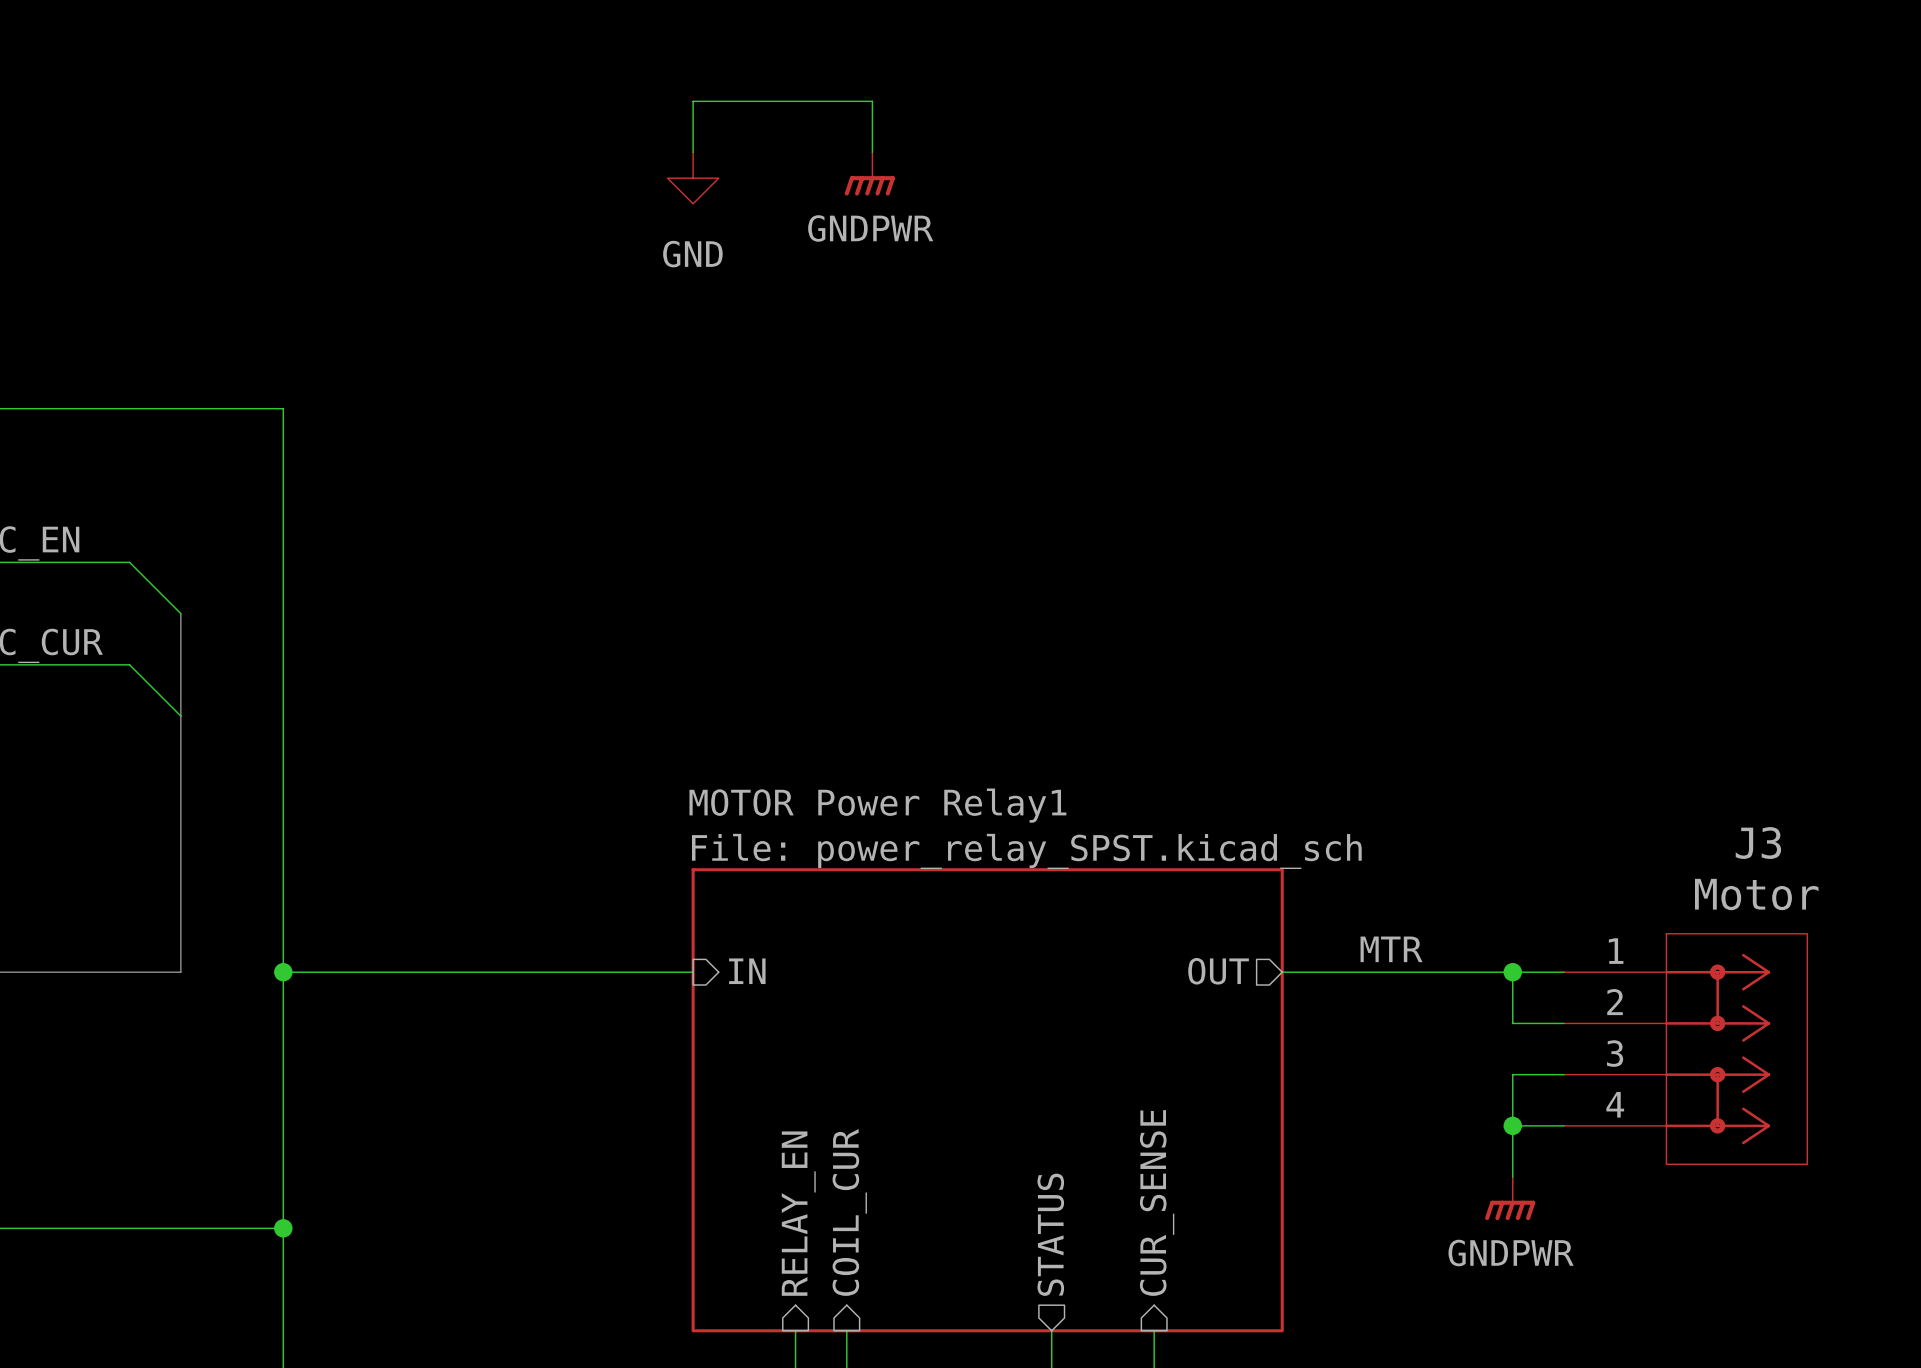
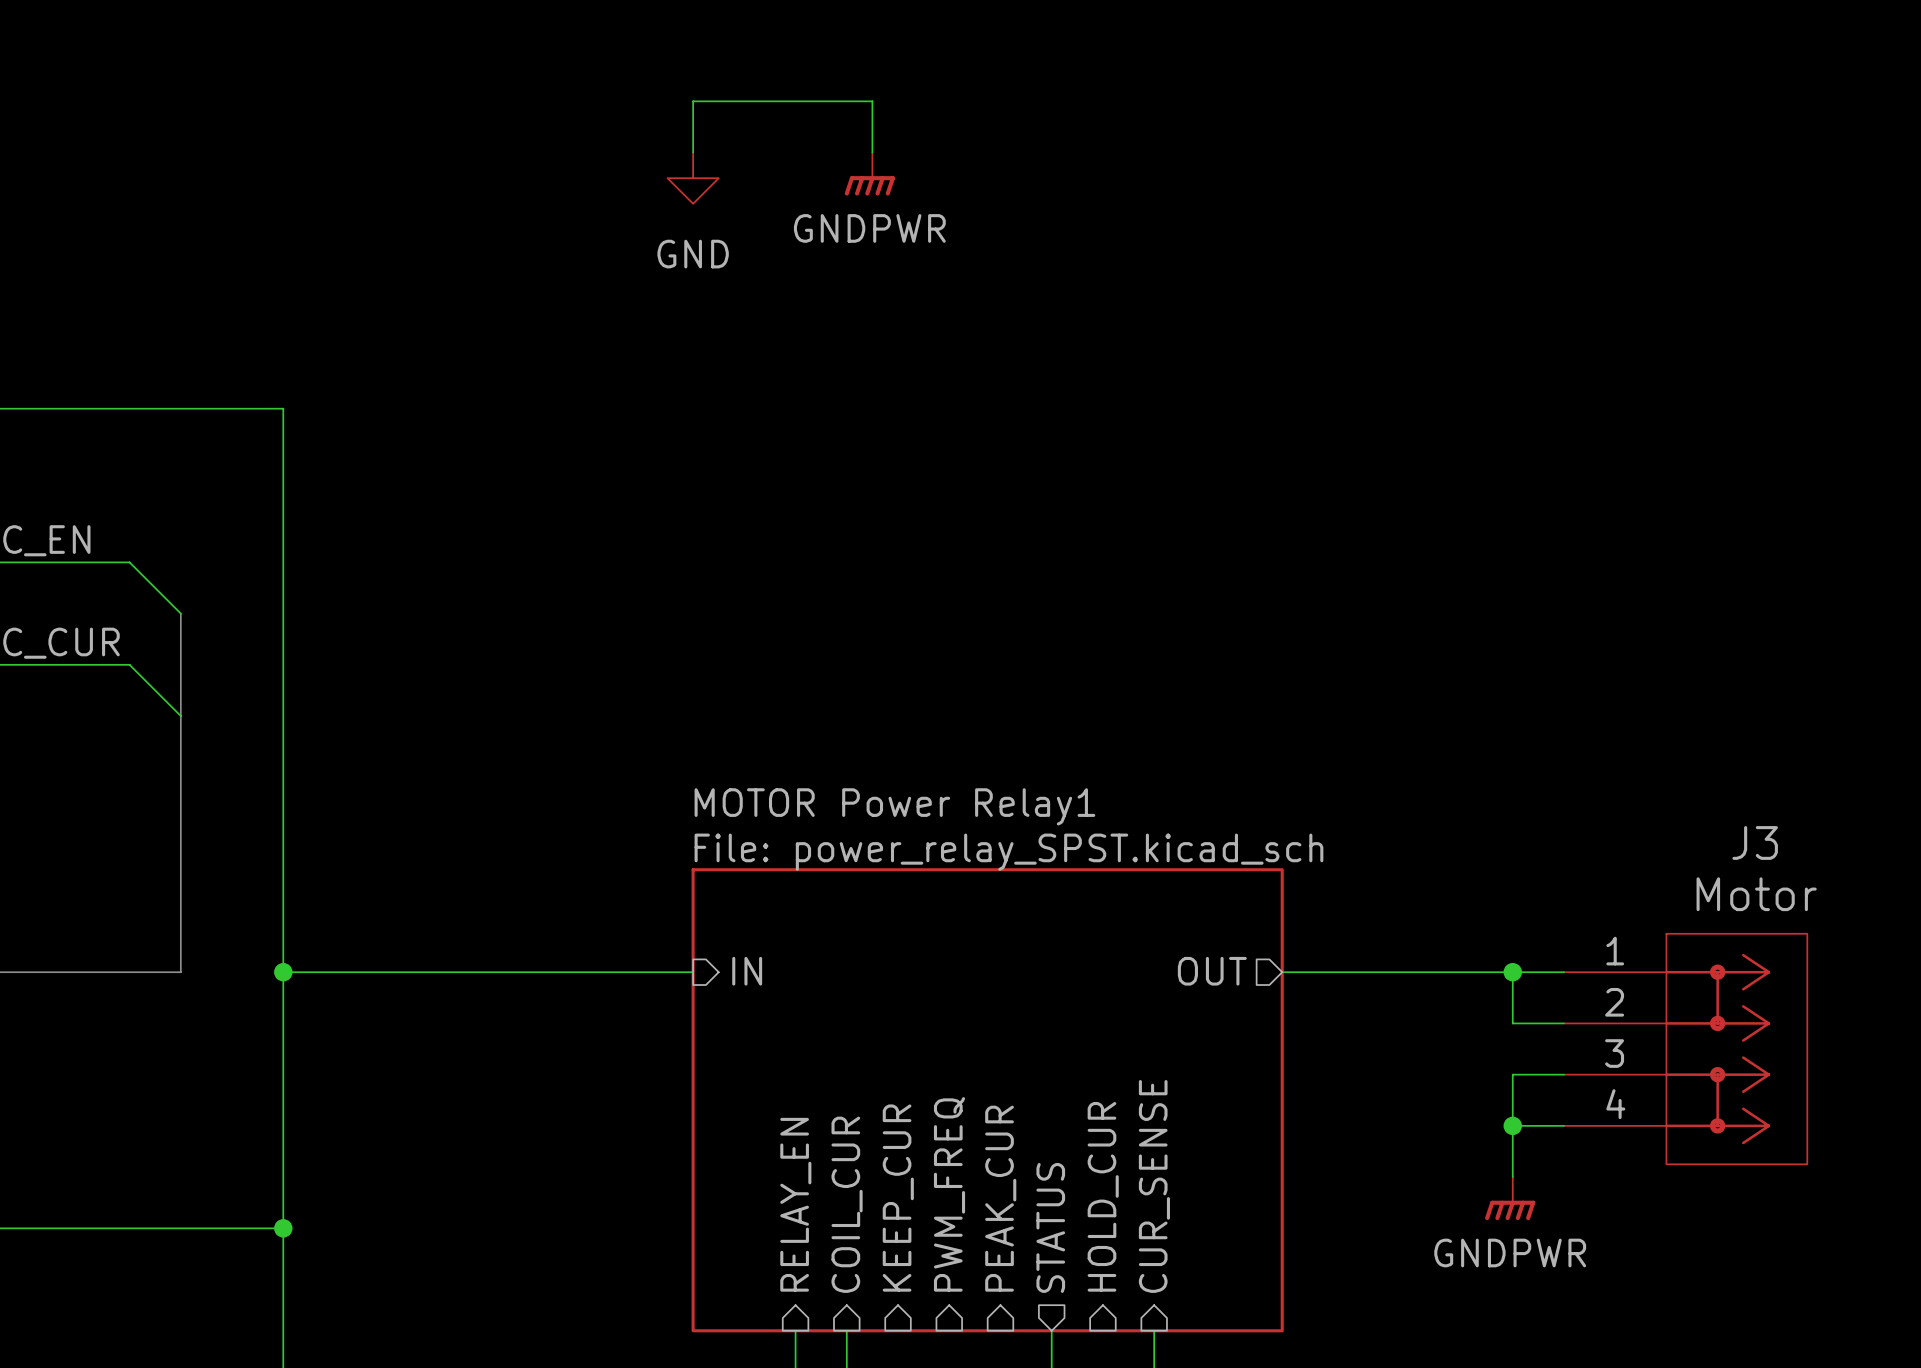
label: MTR (1391, 949) -> none
sheet pin: none -> PEAK_CUR (1000, 1198)
sheet pin: none -> KEEP_CUR (898, 1198)
sheet pin: none -> PWM_FREQ (949, 1194)
sheet pin: none -> HOLD_CUR (1103, 1196)

